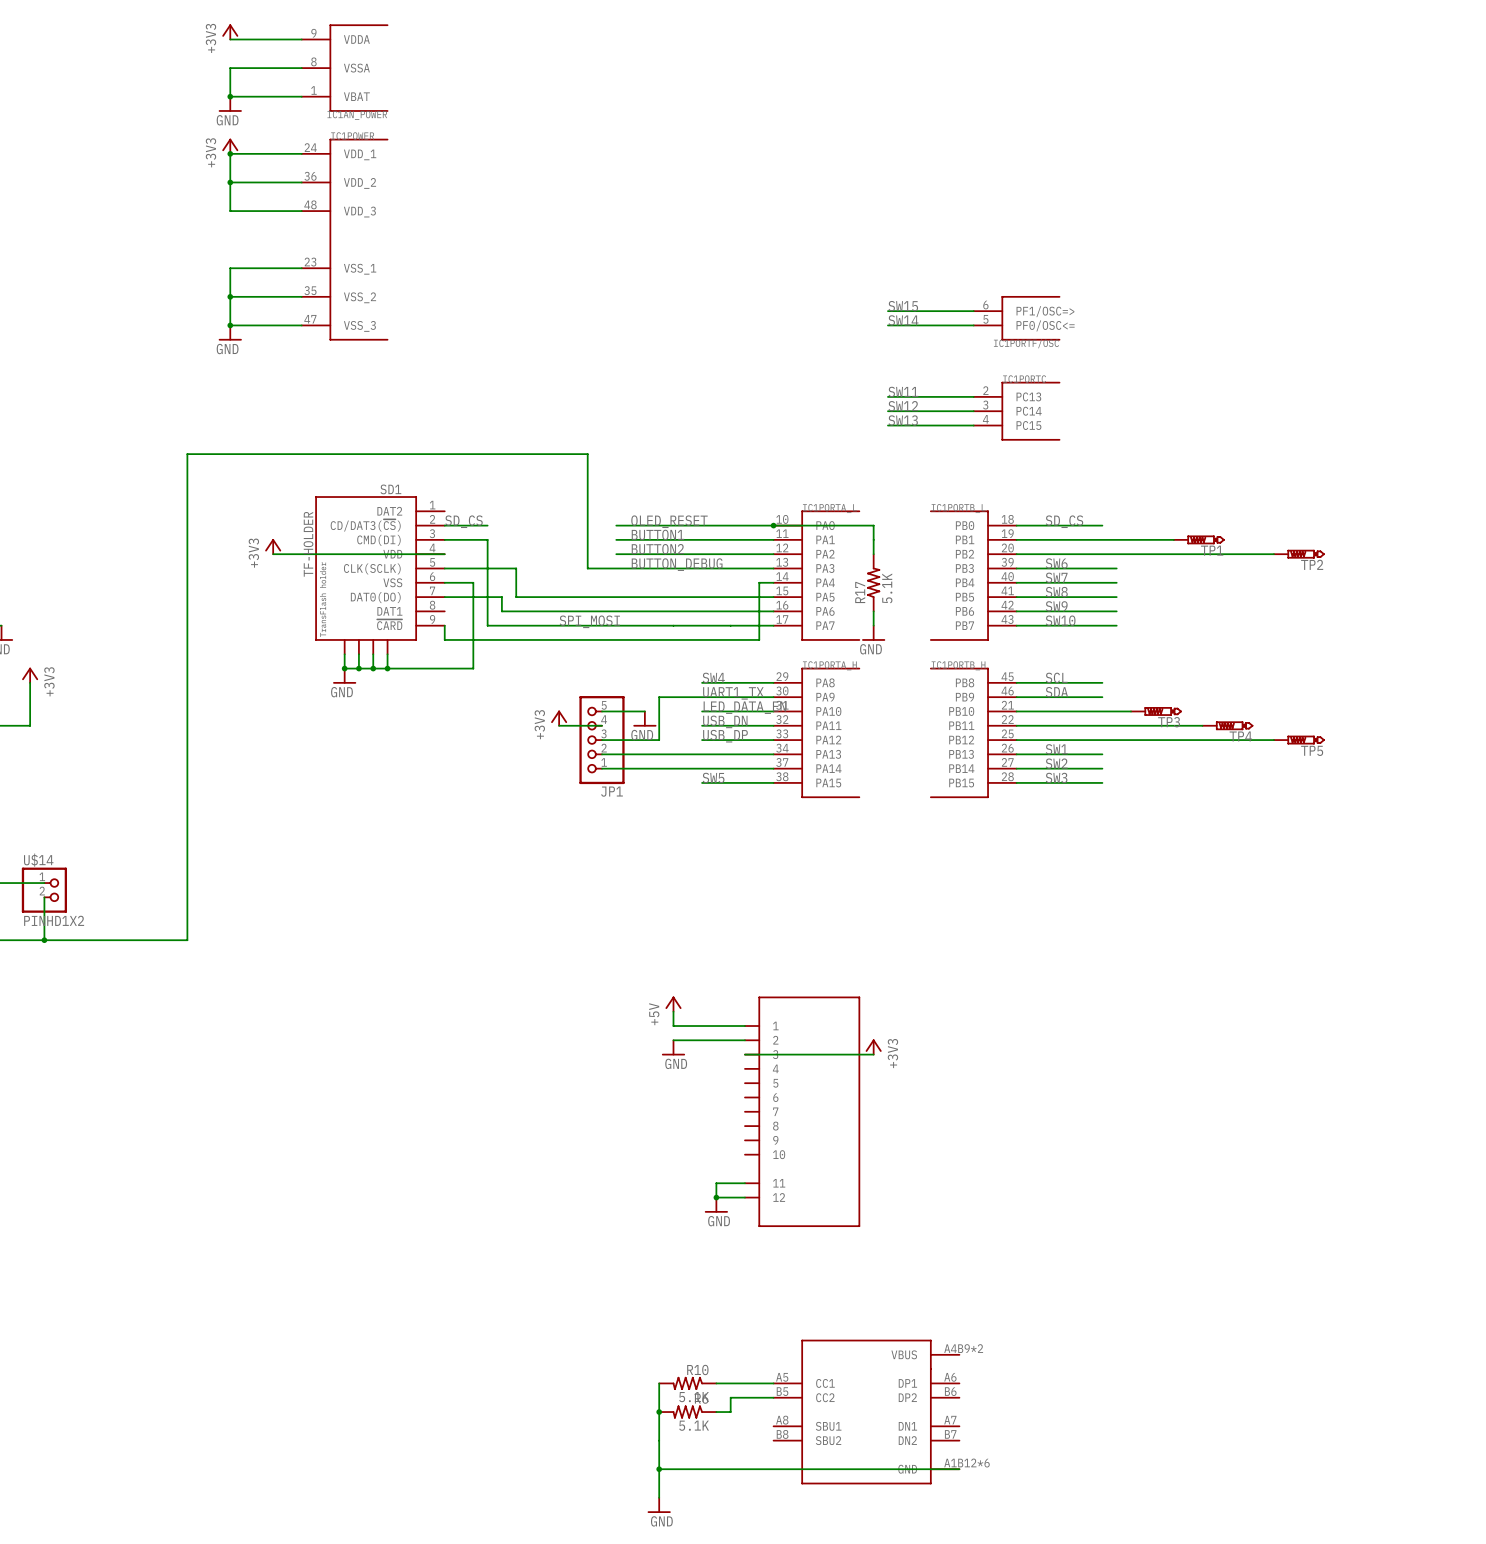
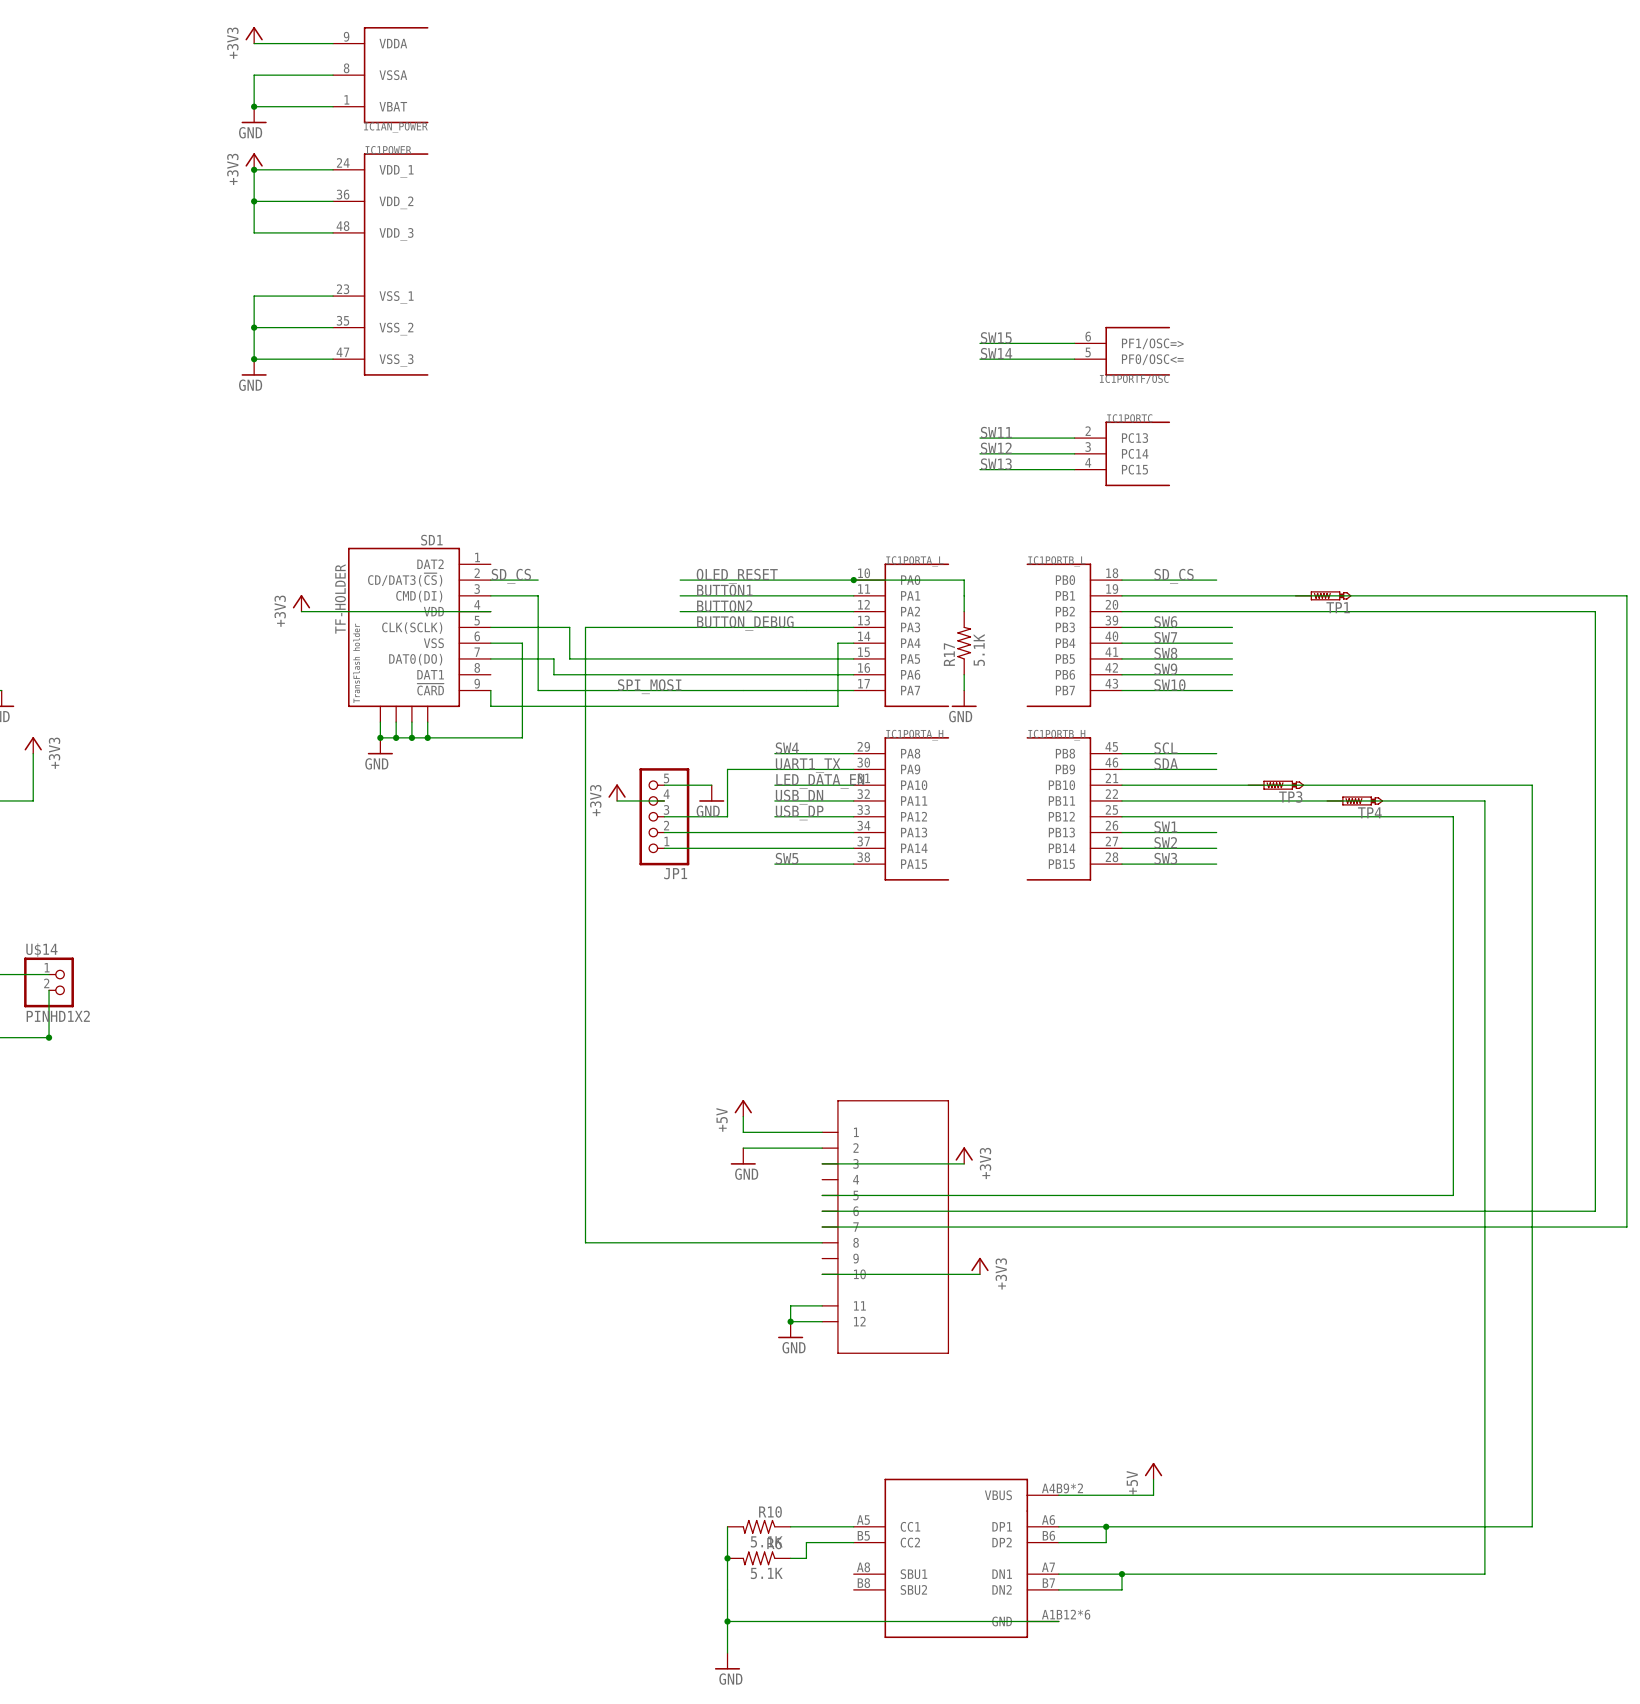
wire: none -> (1295, 595) (1626, 595) (1626, 1227) (822, 1227)
wire: none -> (1406, 611) (1595, 611) (1595, 1211) (822, 1211)
TP2: (1299, 554) -> none
wire: (587, 568) (587, 454) (187, 454) (187, 940) (44, 940) -> (648, 627) (585, 627) (585, 1242) (822, 1242)
wire: none -> (1248, 785) (1532, 785) (1532, 1526) (1058, 1526)
wire: none -> (1327, 800) (1484, 800) (1484, 1574) (1058, 1574)
wire: none -> (1406, 816) (1453, 816) (1453, 1195) (822, 1195)
TP5: (1299, 740) -> none
power symbol: none -> +3V3 (979, 1266)
wire: none -> (822, 1274) (979, 1274)
power symbol: none -> +5V (1153, 1471)
wire: none -> (1153, 1479) (1153, 1495) (1058, 1495)
wire: none -> (1106, 1526) (1106, 1542) (1058, 1542)
junction: none -> (1106, 1526)
wire: none -> (1121, 1574) (1121, 1589) (1058, 1589)
junction: none -> (1121, 1574)

